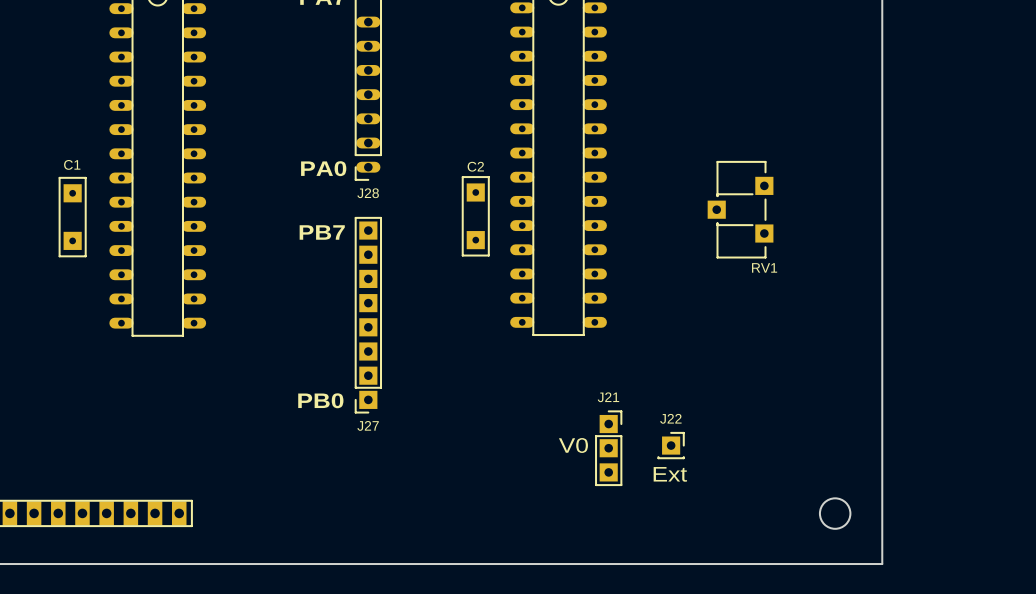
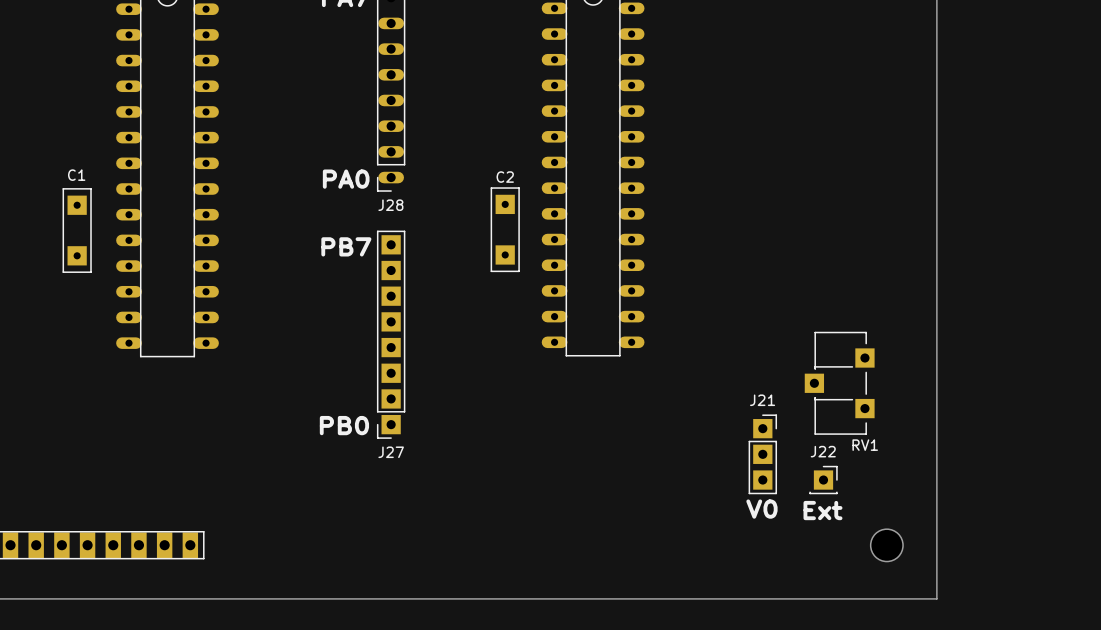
RV1 position: (740, 209) -> (839, 383)
J21 value position: V0 (573, 445) -> V0 (761, 509)
J22 position: (671, 445) -> (823, 480)
J21 position: (608, 448) -> (762, 454)

